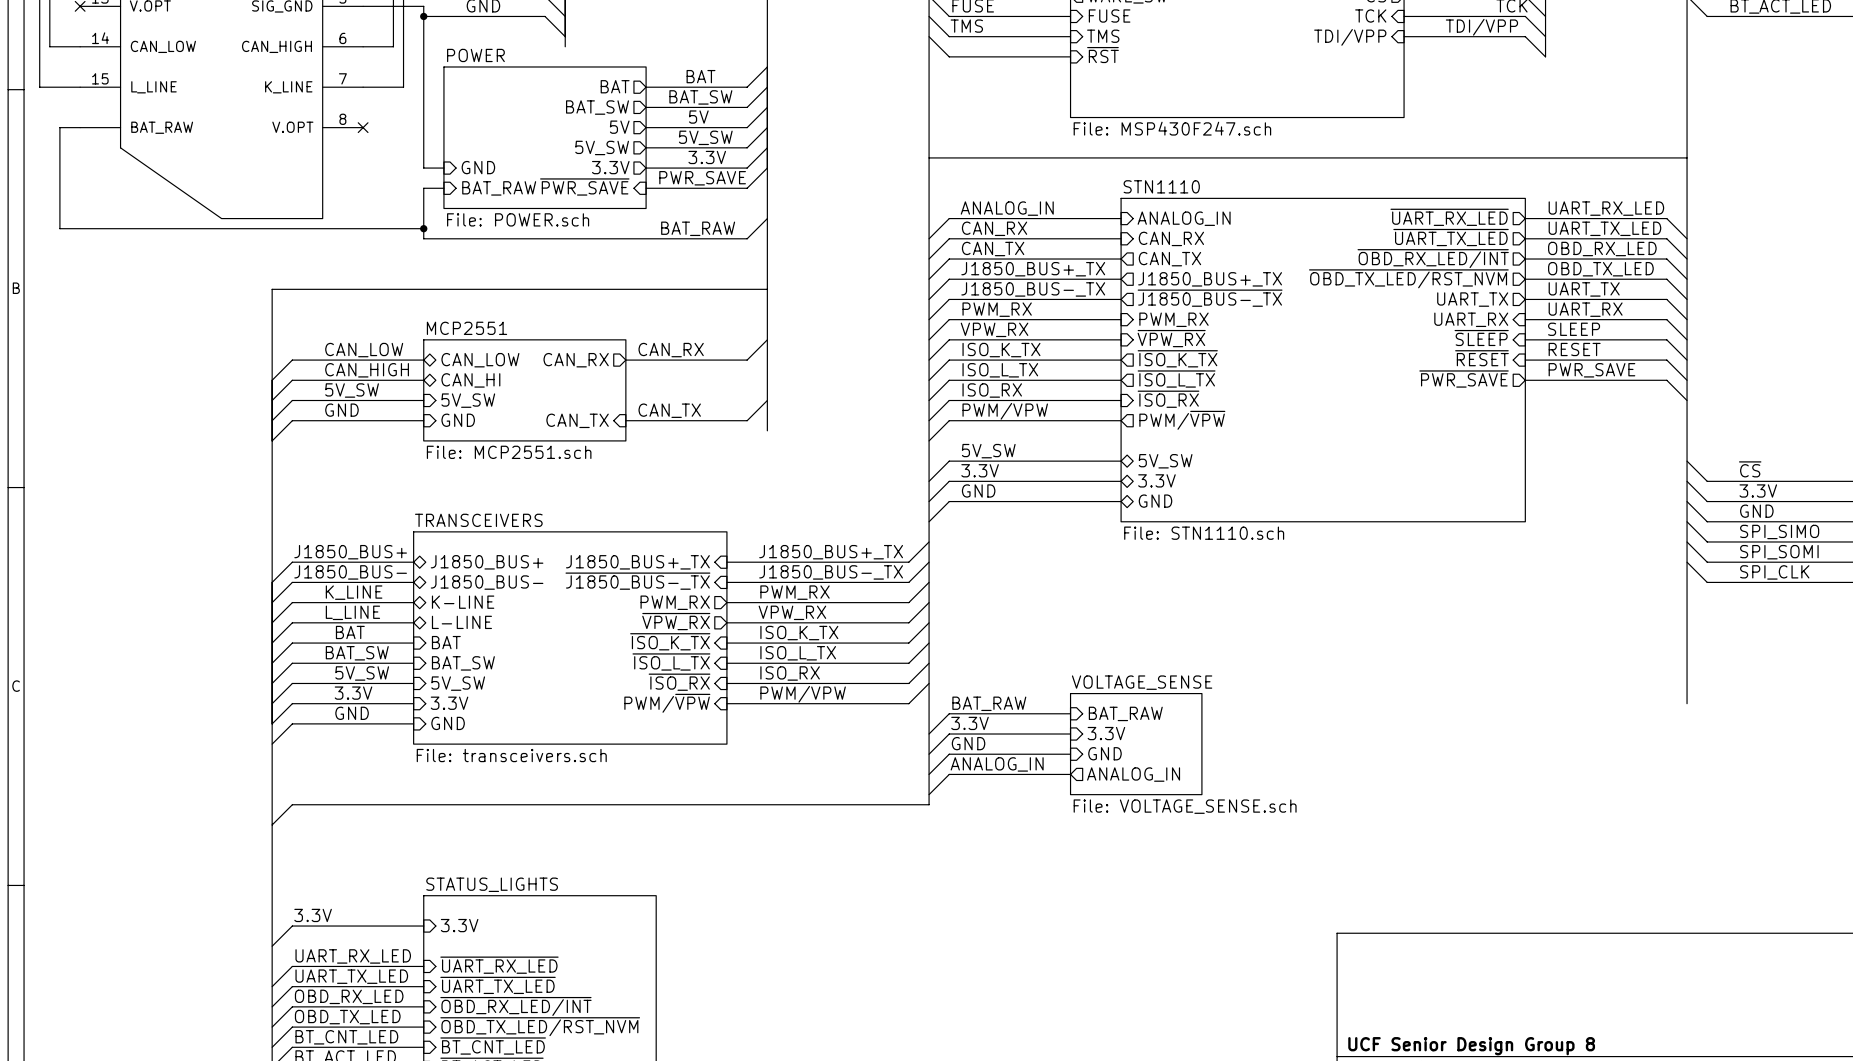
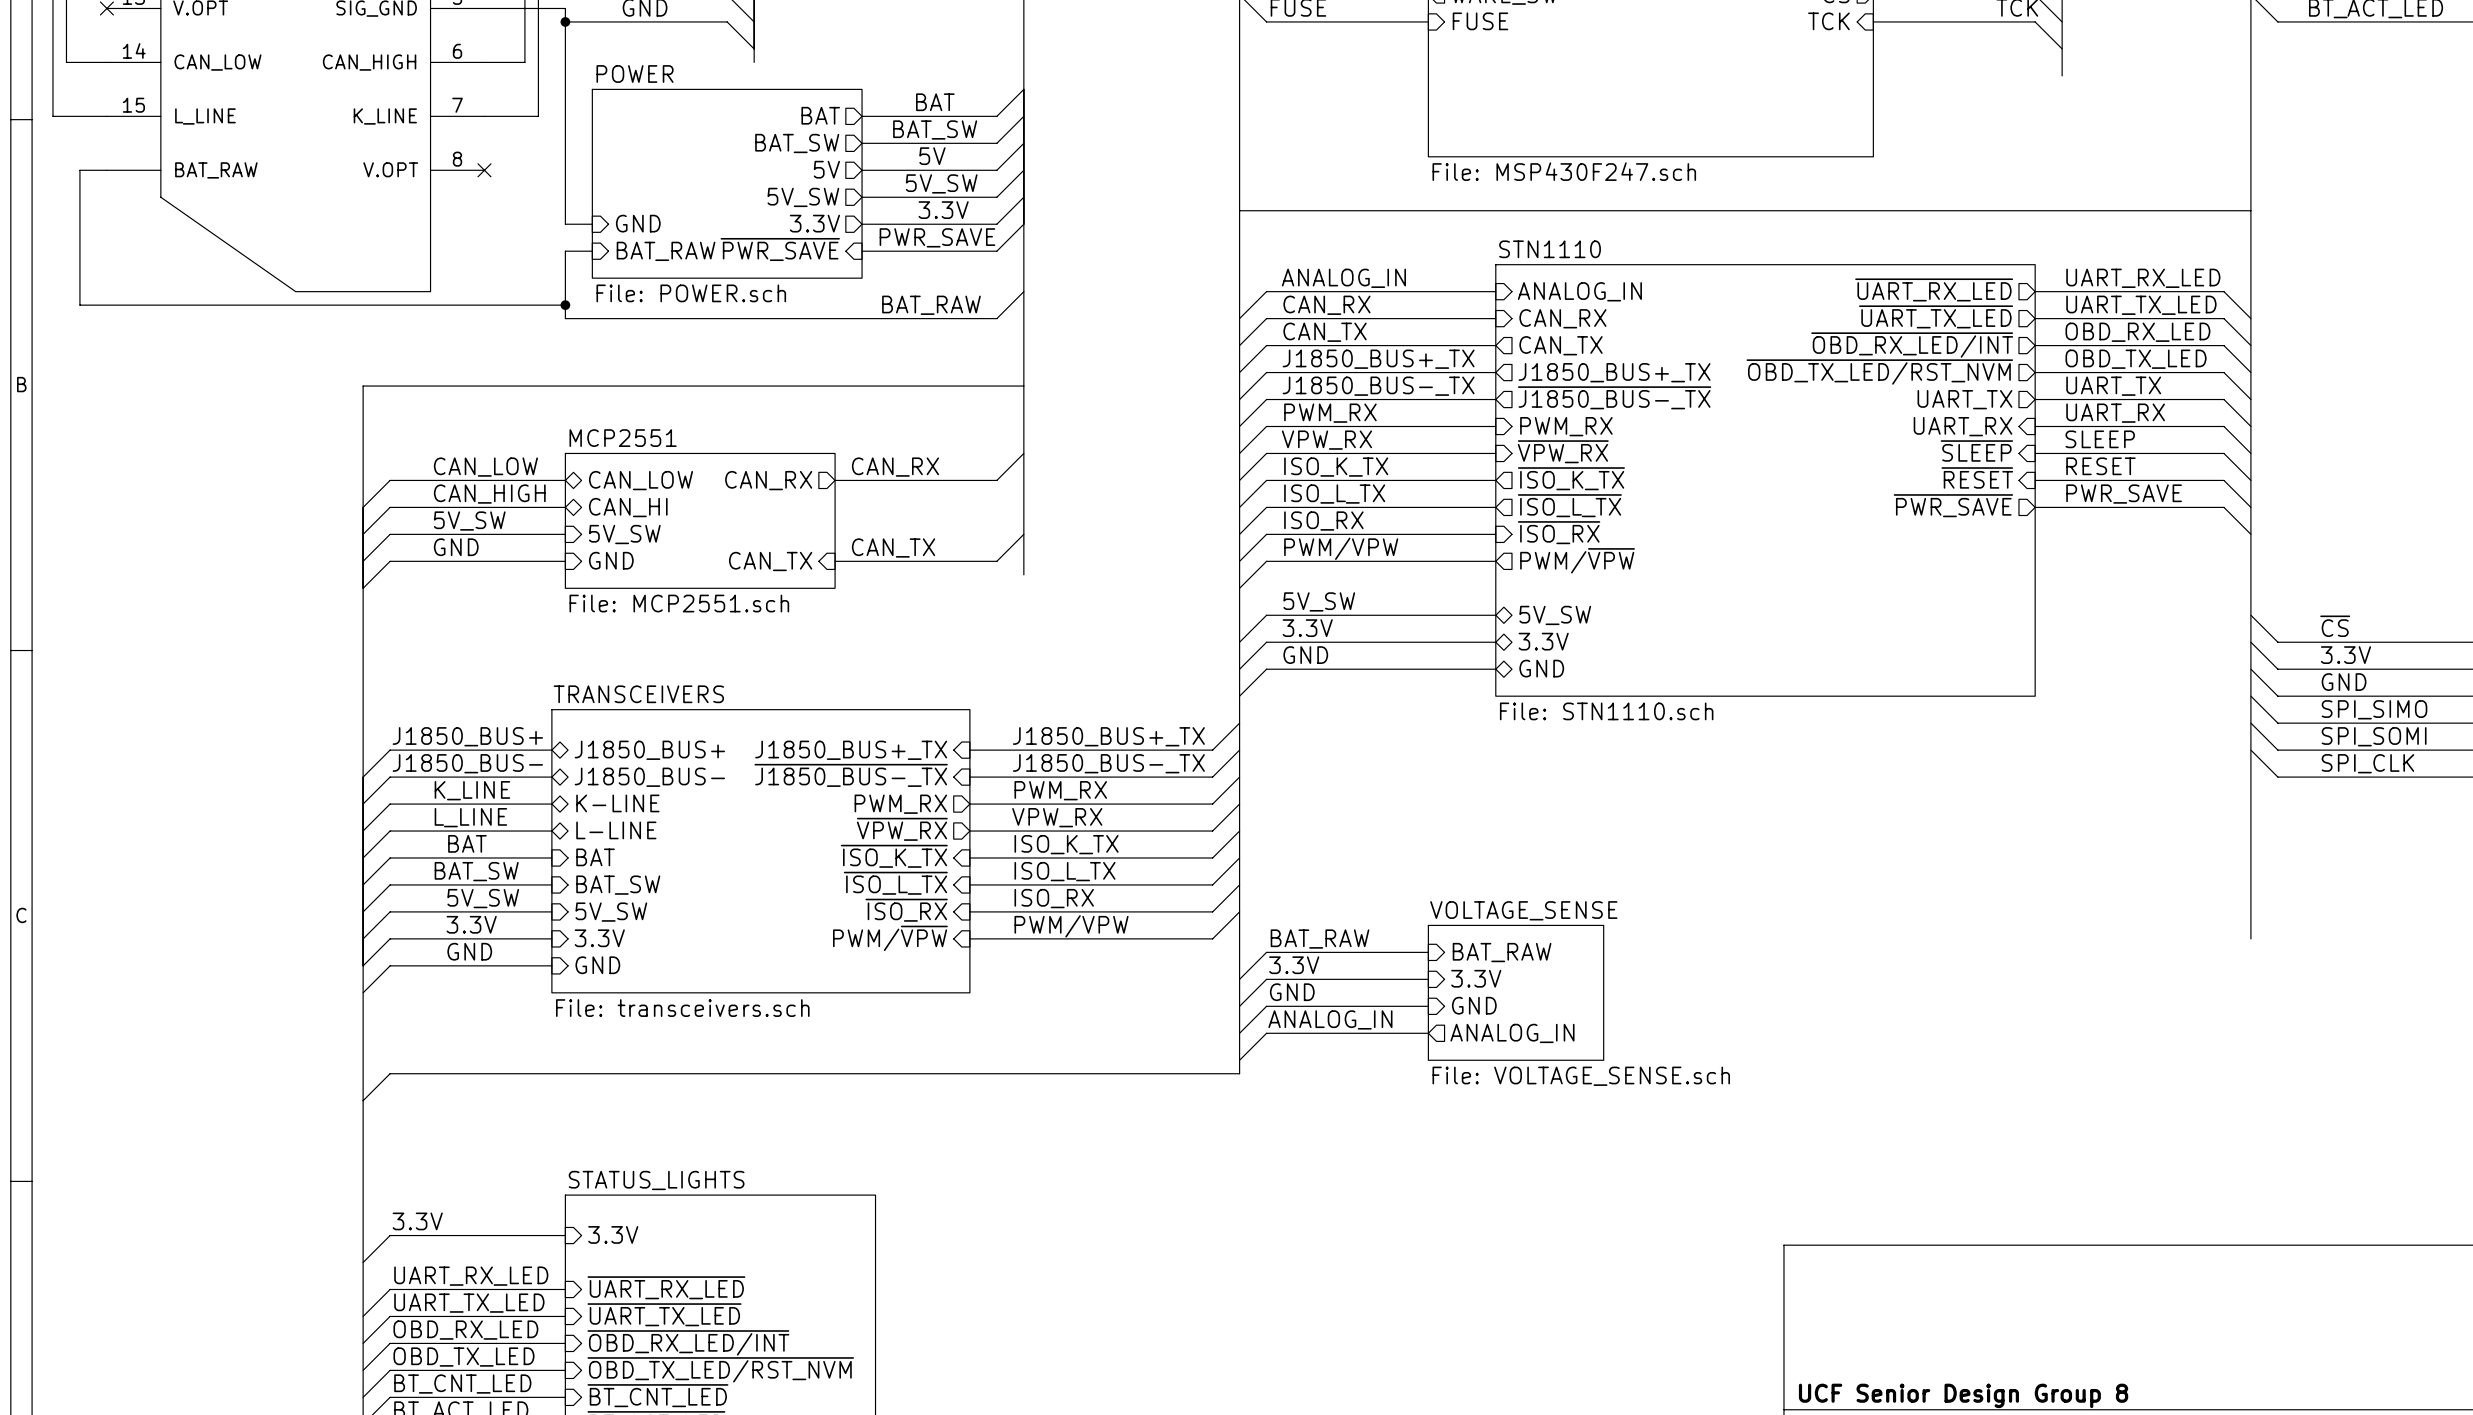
wire: (929, 16) (949, 36) (1070, 36) -> none
label: TMS (966, 26) -> none
label: TDI/VPP (1481, 27) -> none
wire: (929, 36) (949, 56) (1070, 56) -> none
sheet pin: TMS (1103, 36) -> none
wire: (1404, 36) (1525, 36) (1545, 56) -> none
sheet pin: TDI/VPP (1350, 37) -> none
sheet pin: ~{RST} (1102, 55) -> none

